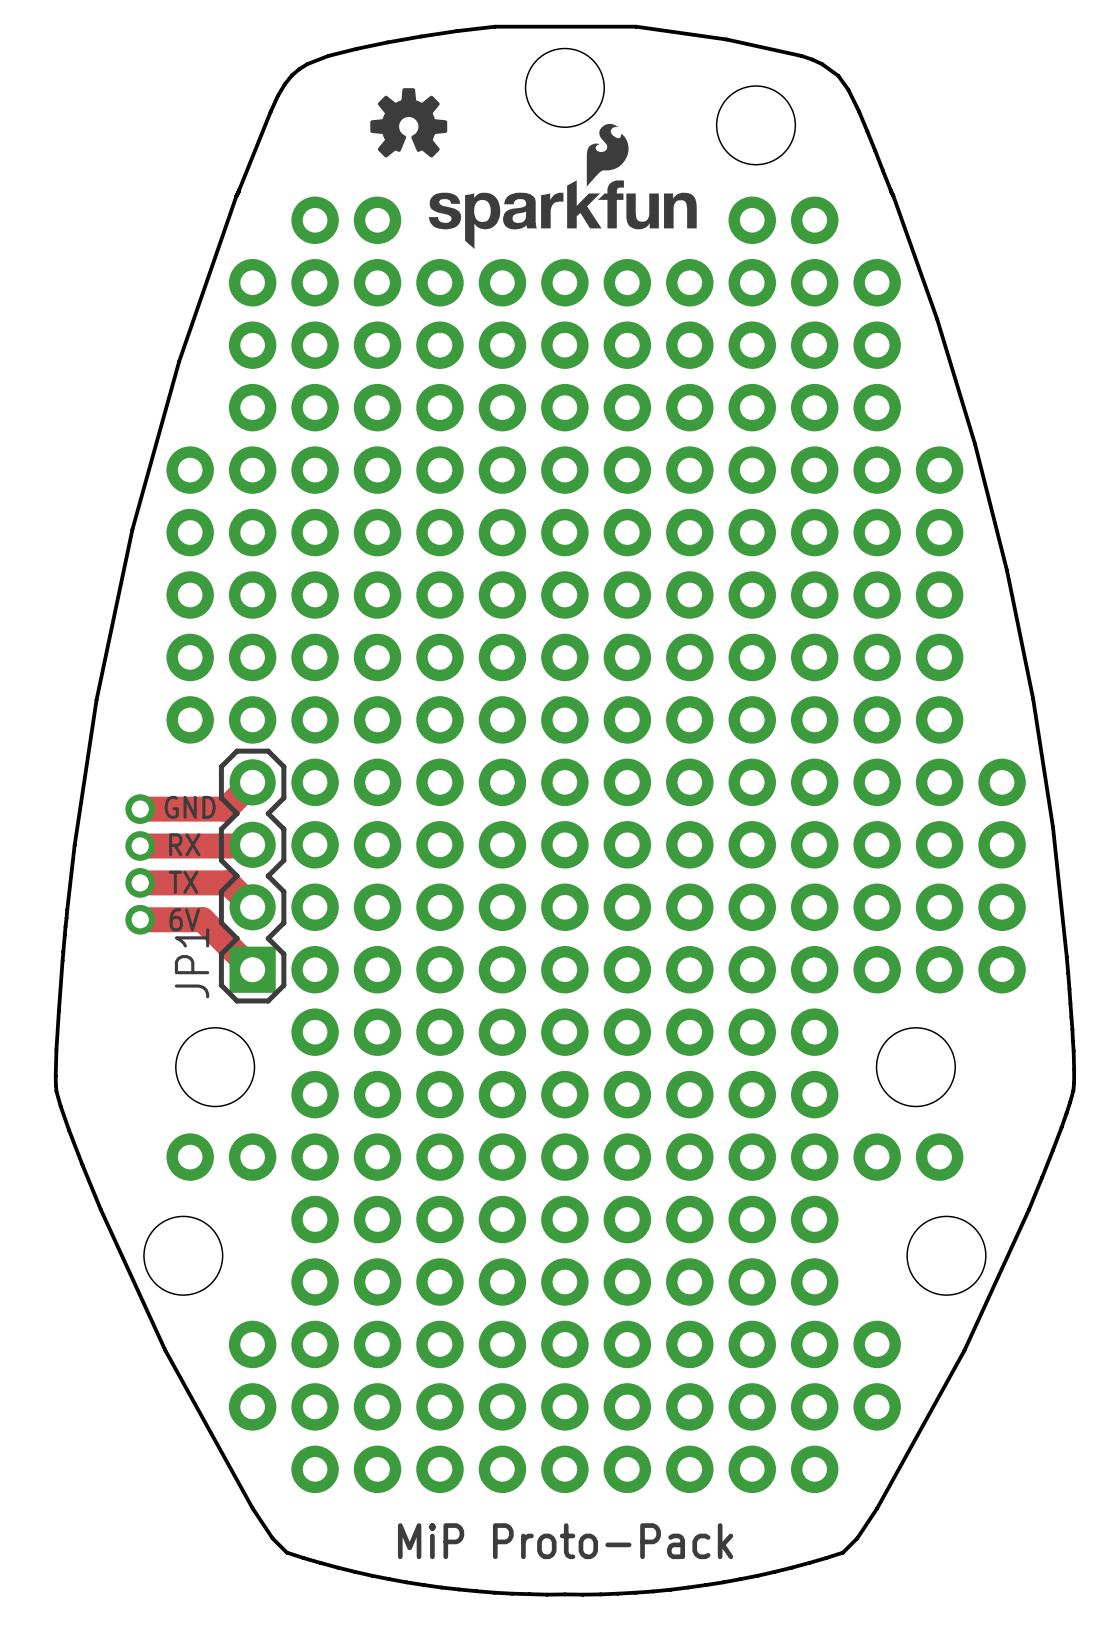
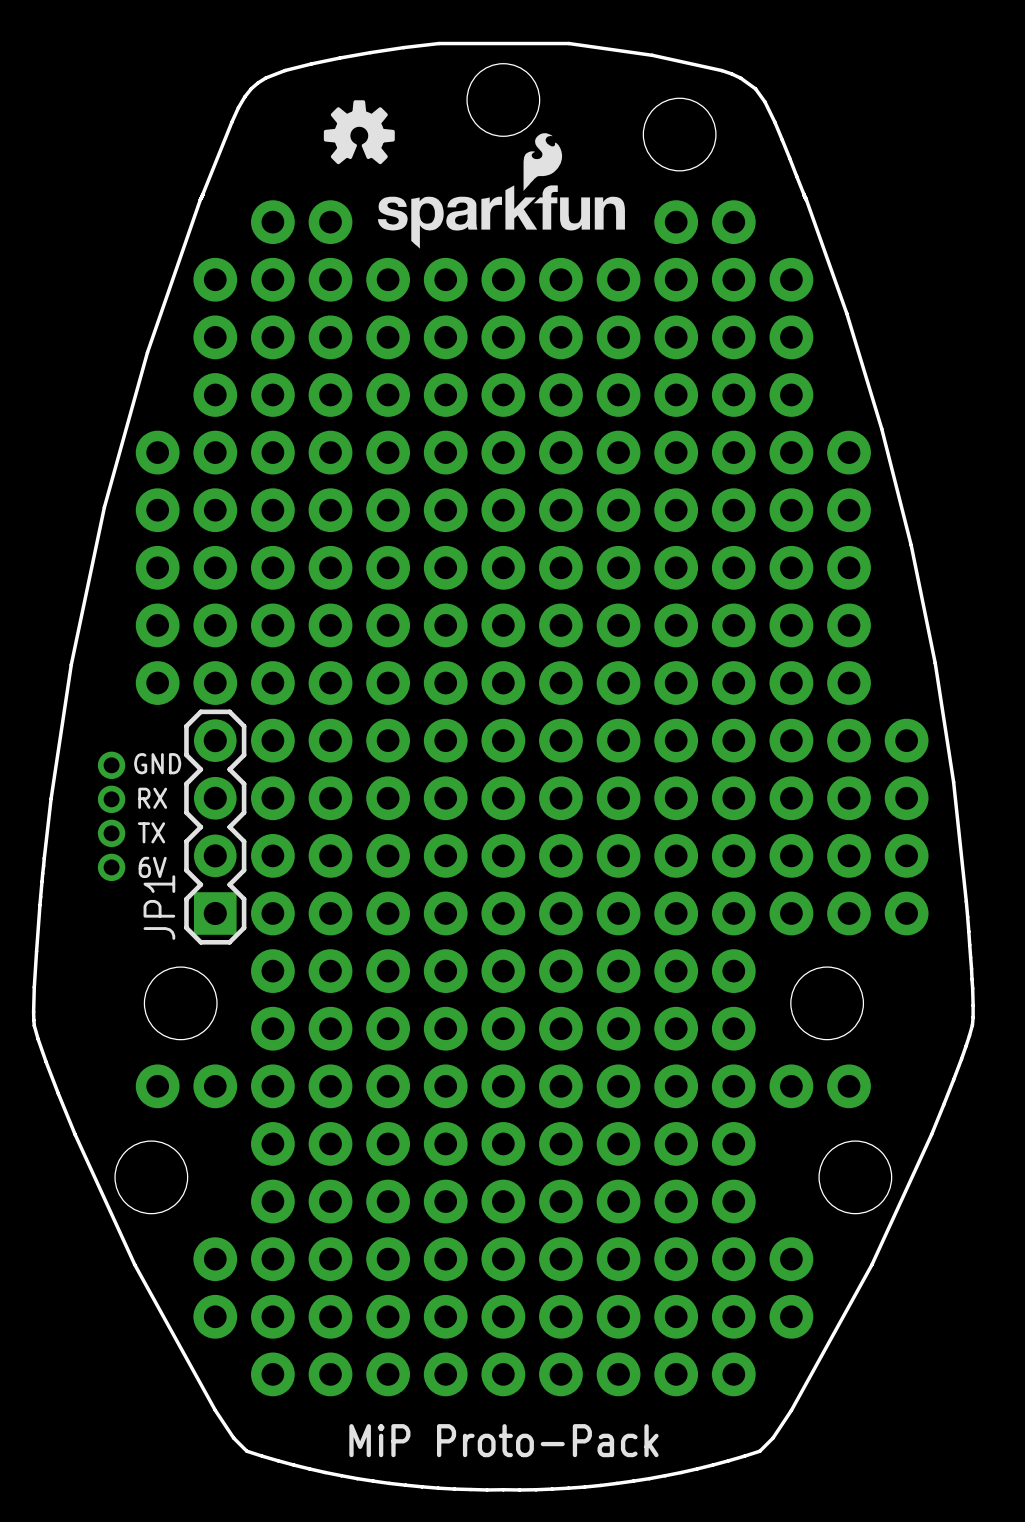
track: (252, 782) (225, 809) (140, 809) -> none
track: (252, 844) (140, 846) -> none
track: (140, 882) (228, 882) (252, 907) -> none
track: (140, 919) (202, 919) (252, 969) -> none

